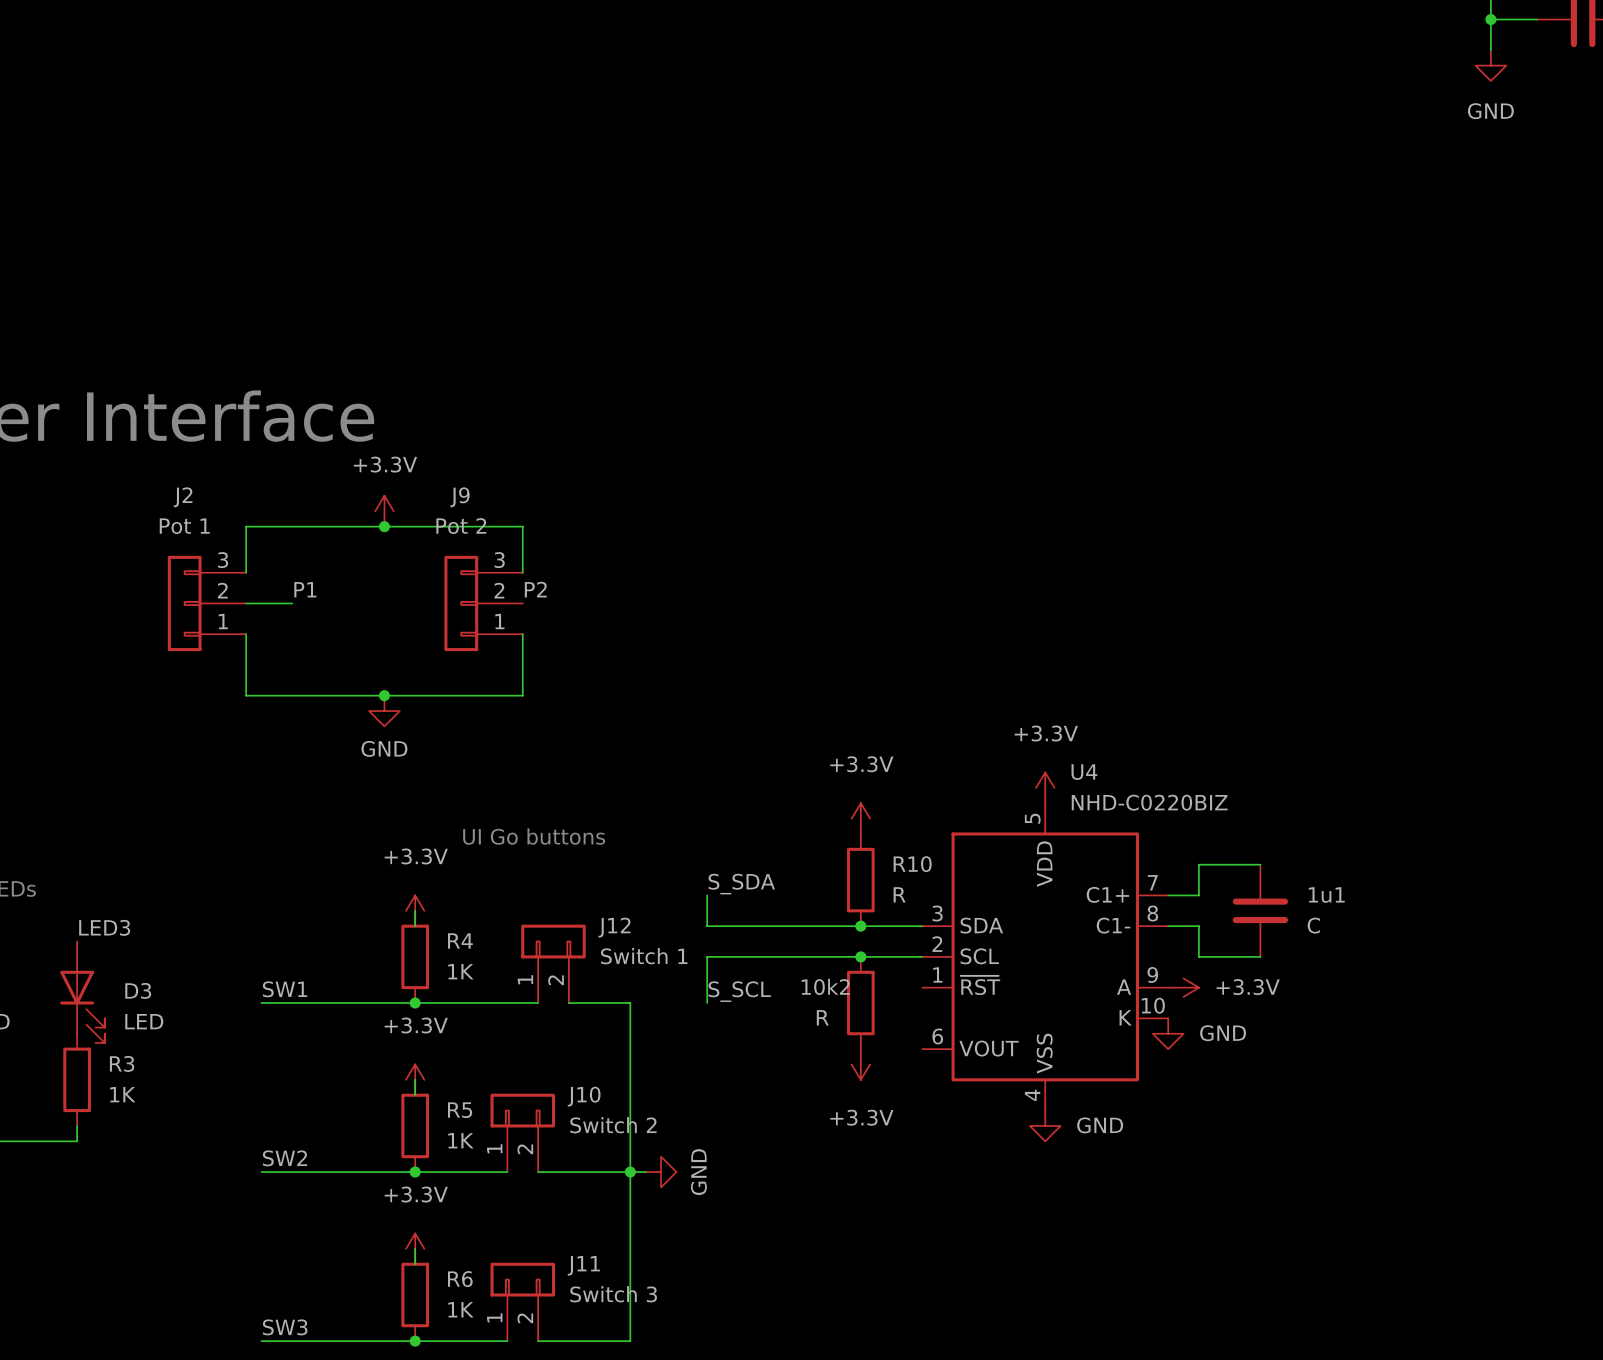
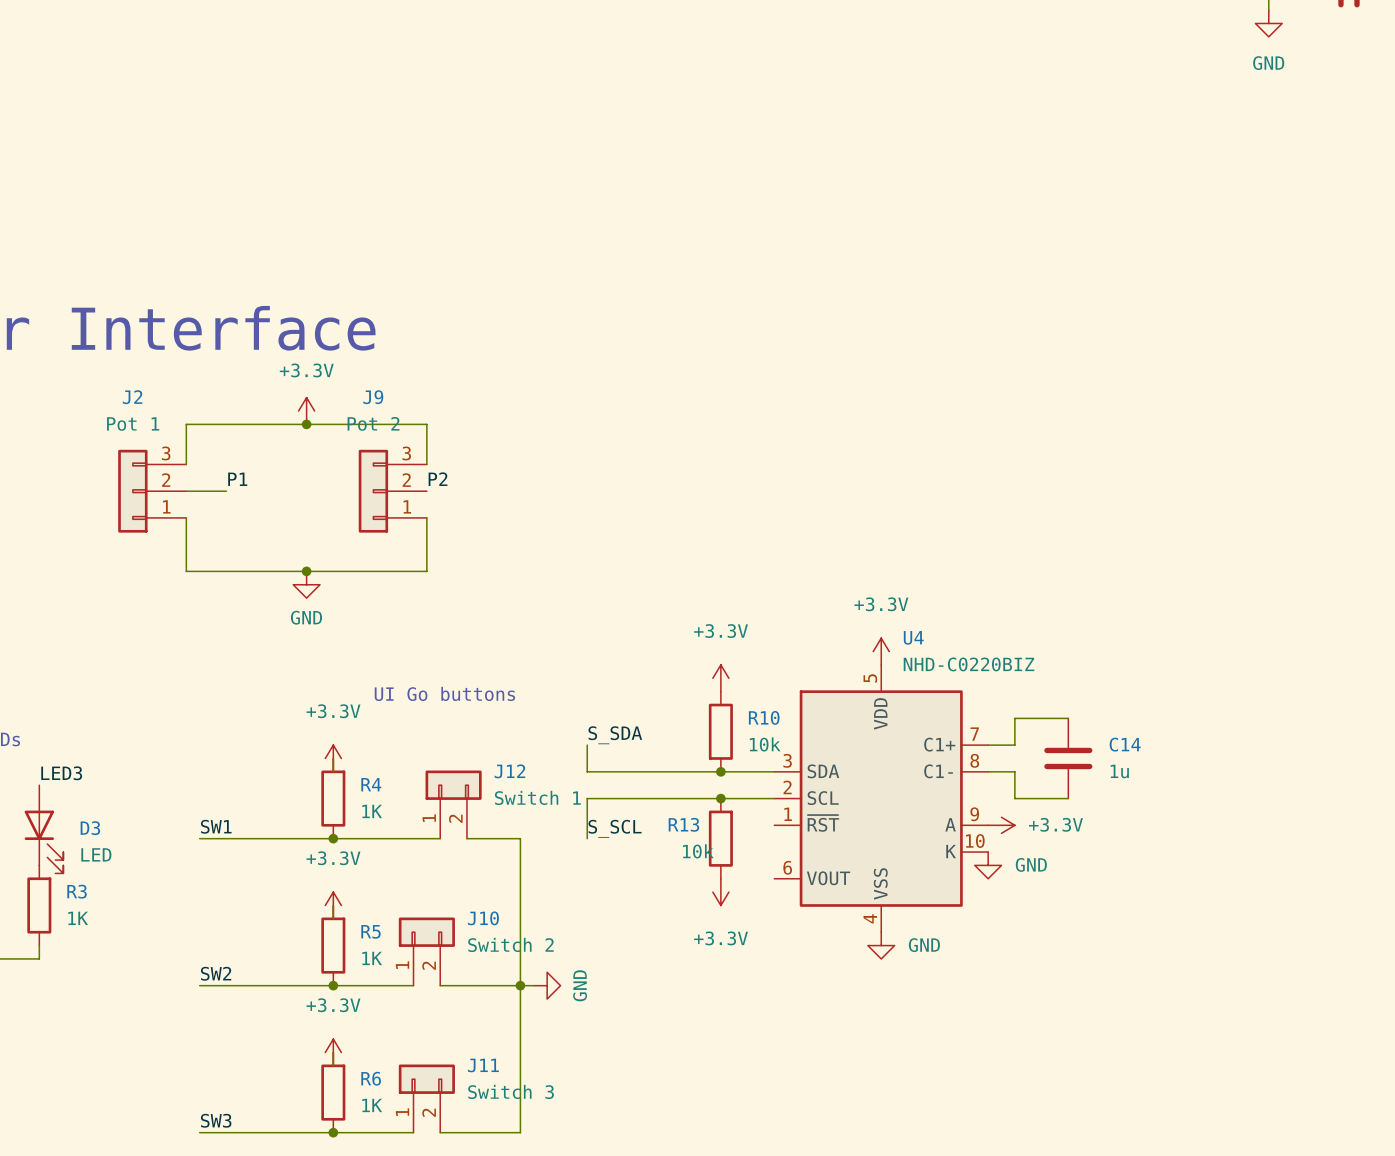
R10 value: R (899, 894) -> 10k (765, 744)
1u1 name: 1u1 (1326, 895) -> C14 (1125, 744)
1u1 value: C (1313, 925) -> 1u (1119, 771)
10k2 name: 10k2 (825, 986) -> R13 (683, 824)
10k2 value: R (822, 1017) -> 10k (698, 851)

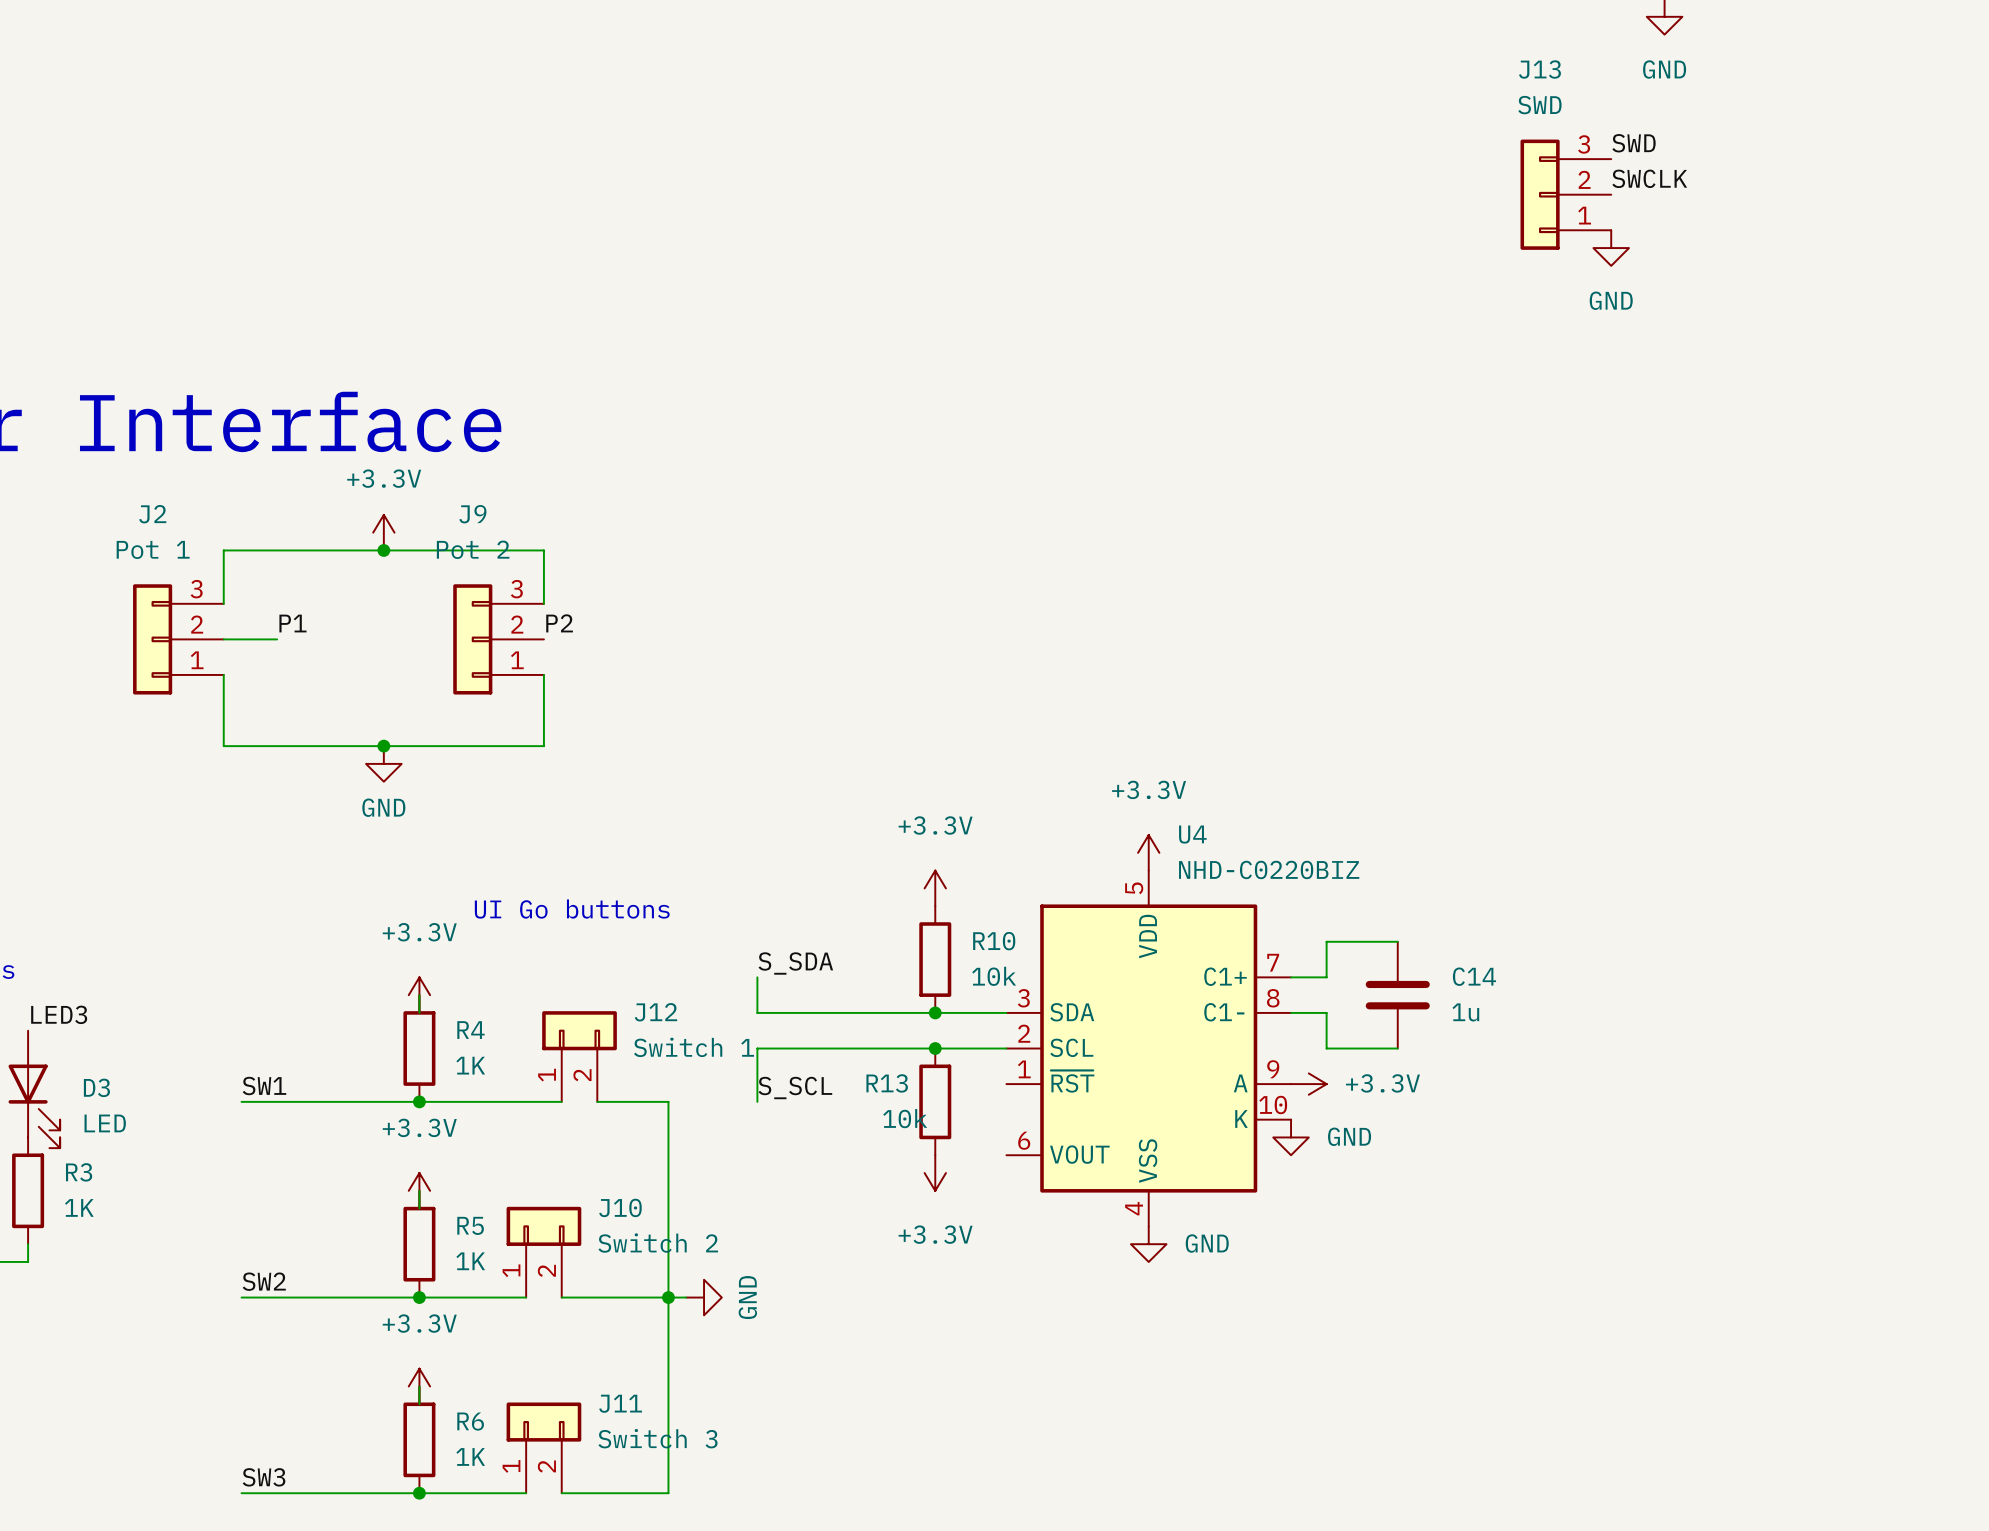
label: none -> SWD (1634, 143)
label: none -> SWCLK (1649, 178)
J13: none -> SWD (1565, 194)
power symbol: none -> GND (1611, 248)

